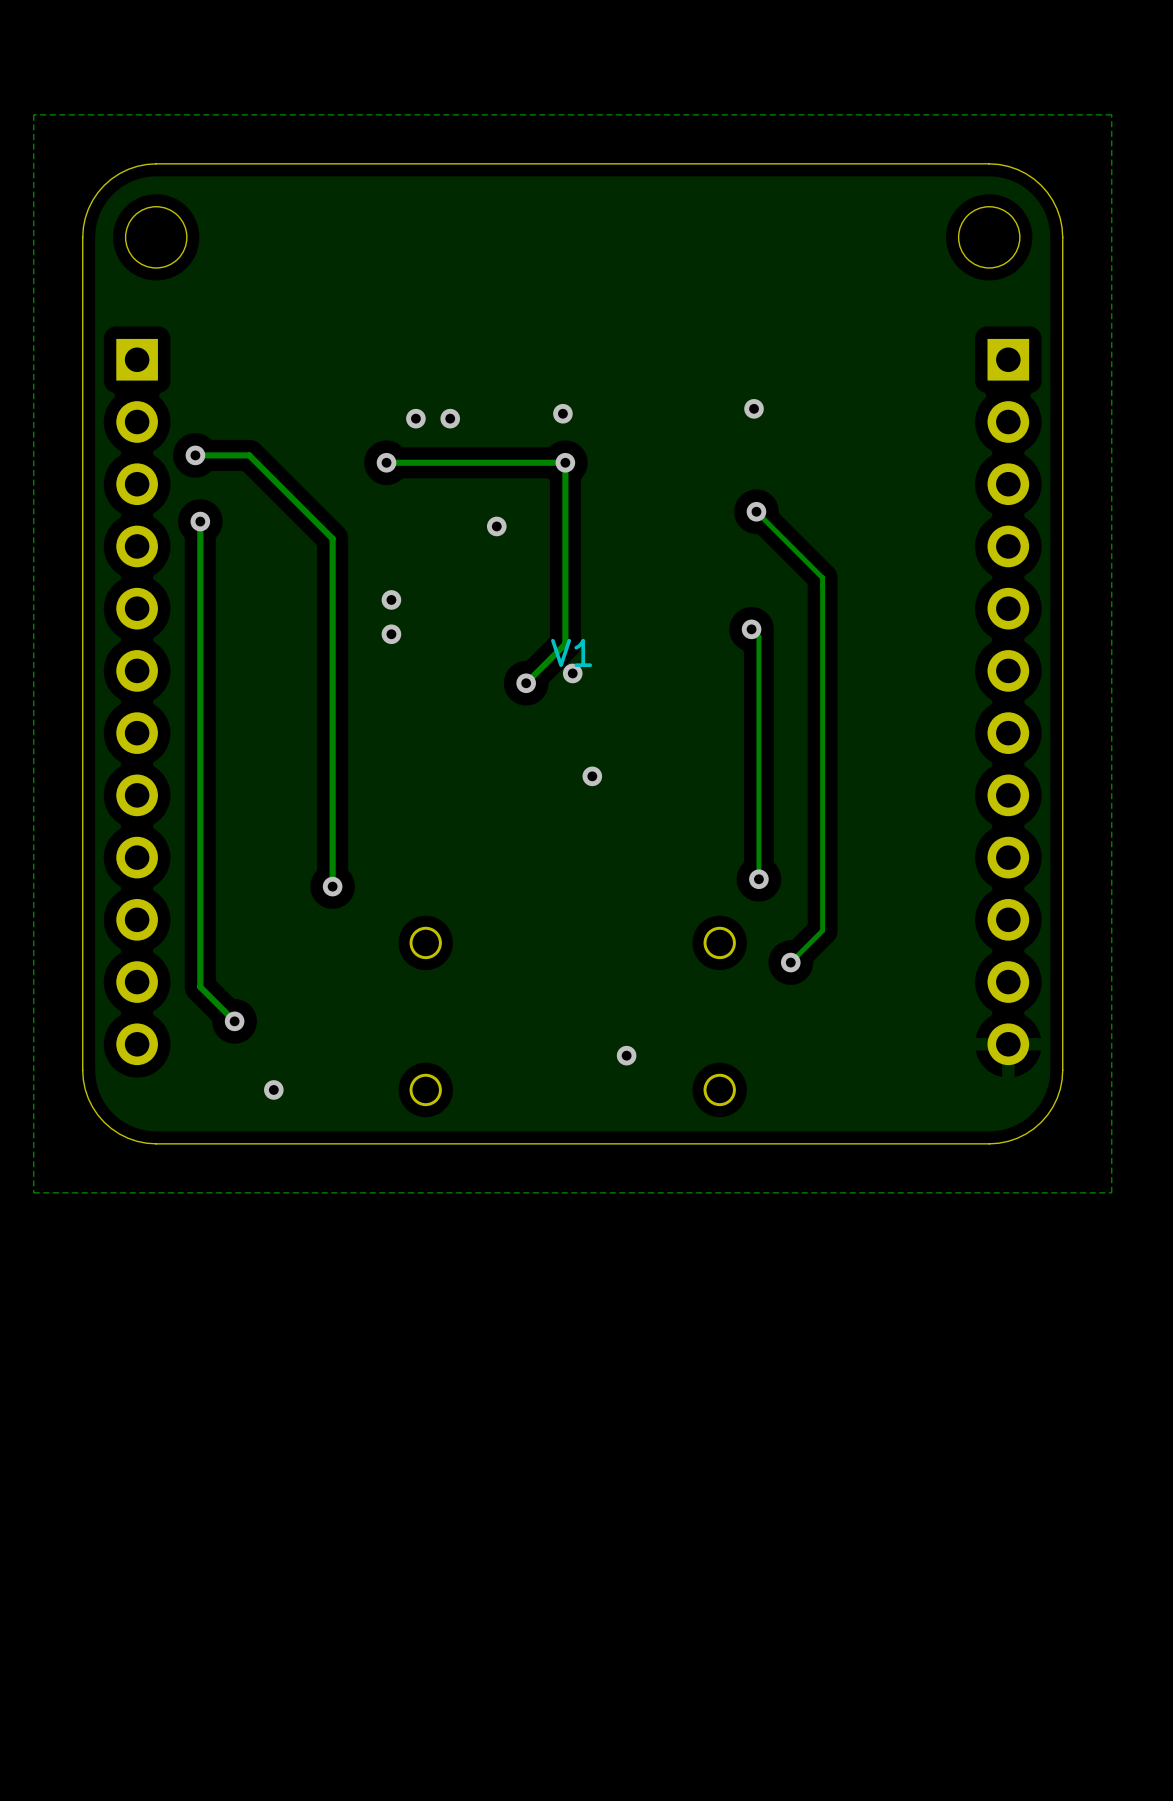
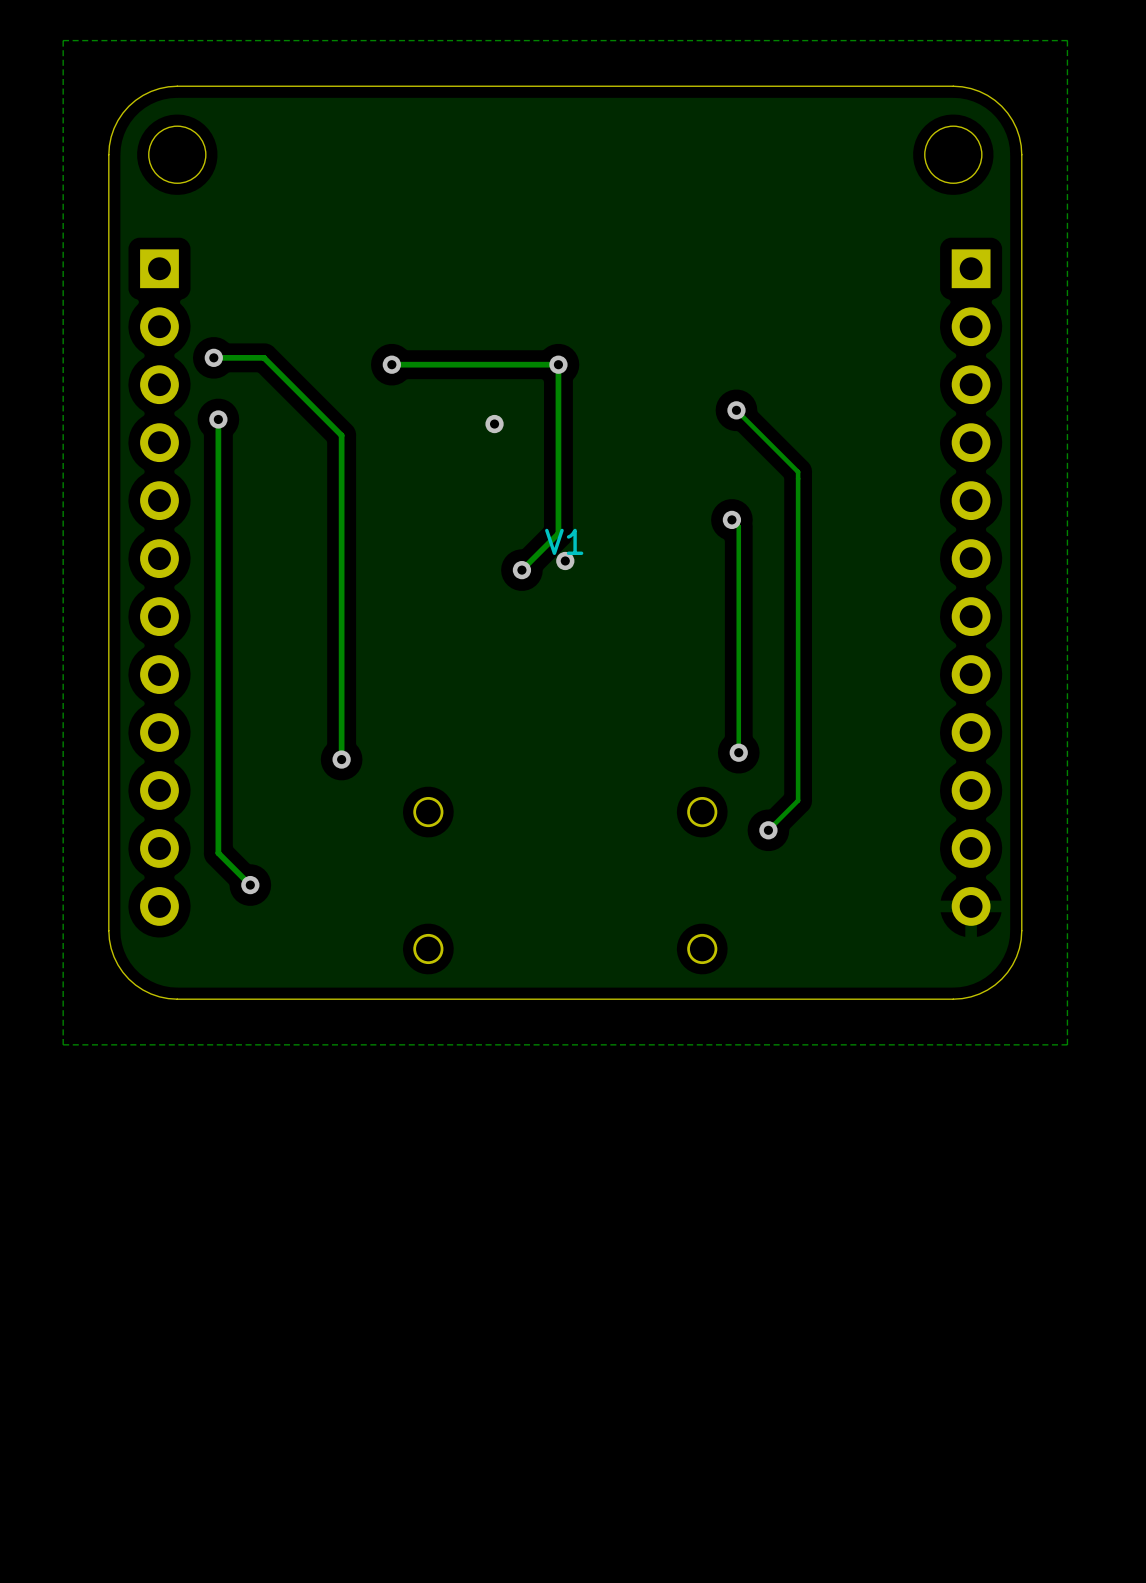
via: (754, 408) -> none
via: (562, 413) -> none
via: (415, 418) -> none
via: (450, 418) -> none
via: (391, 599) -> none
via: (391, 634) -> none
via: (592, 776) -> none
via: (626, 1055) -> none
via: (273, 1089) -> none

